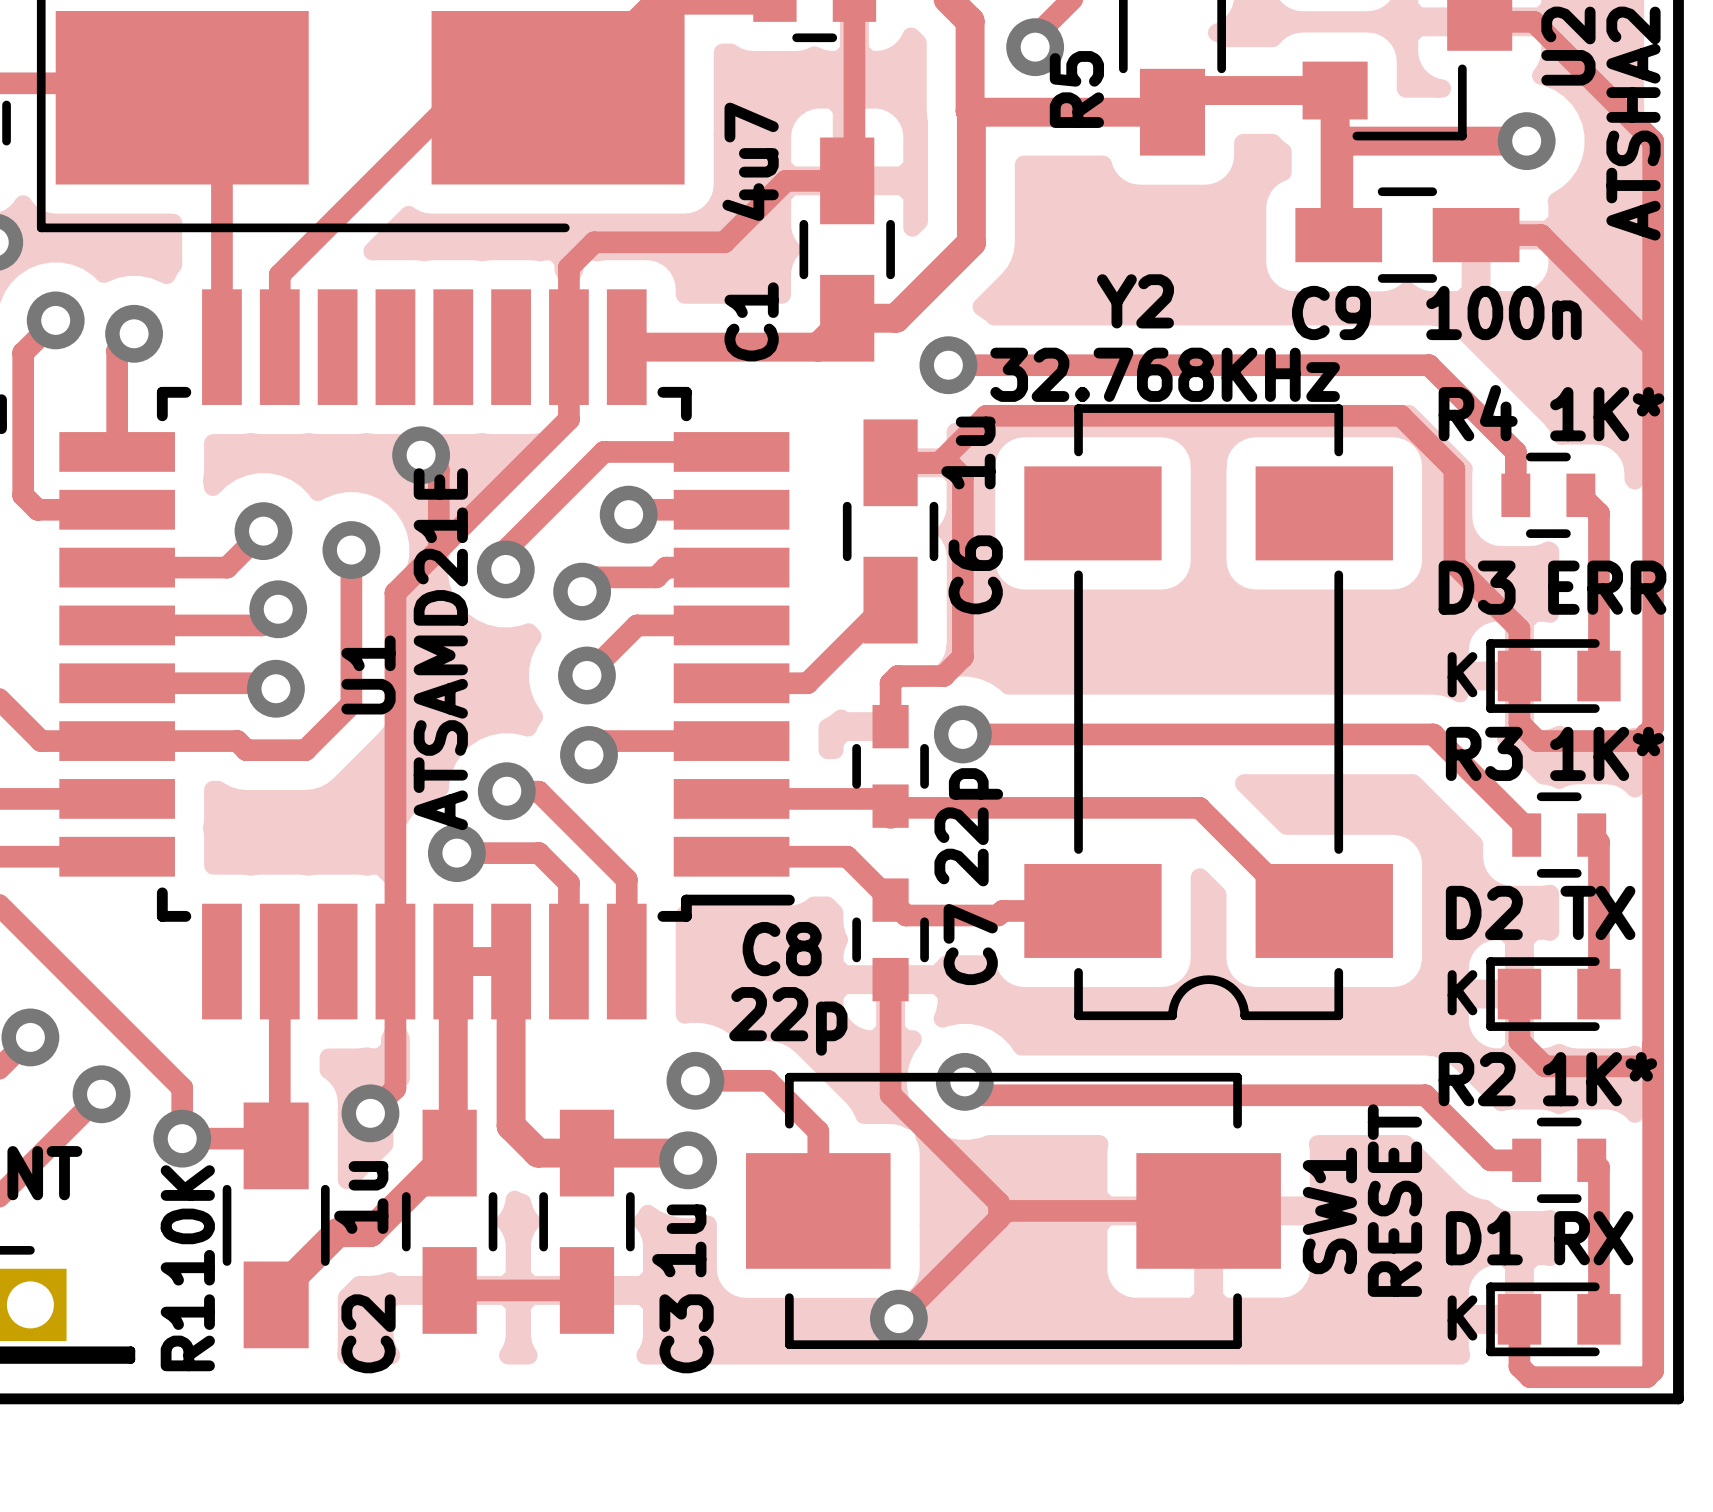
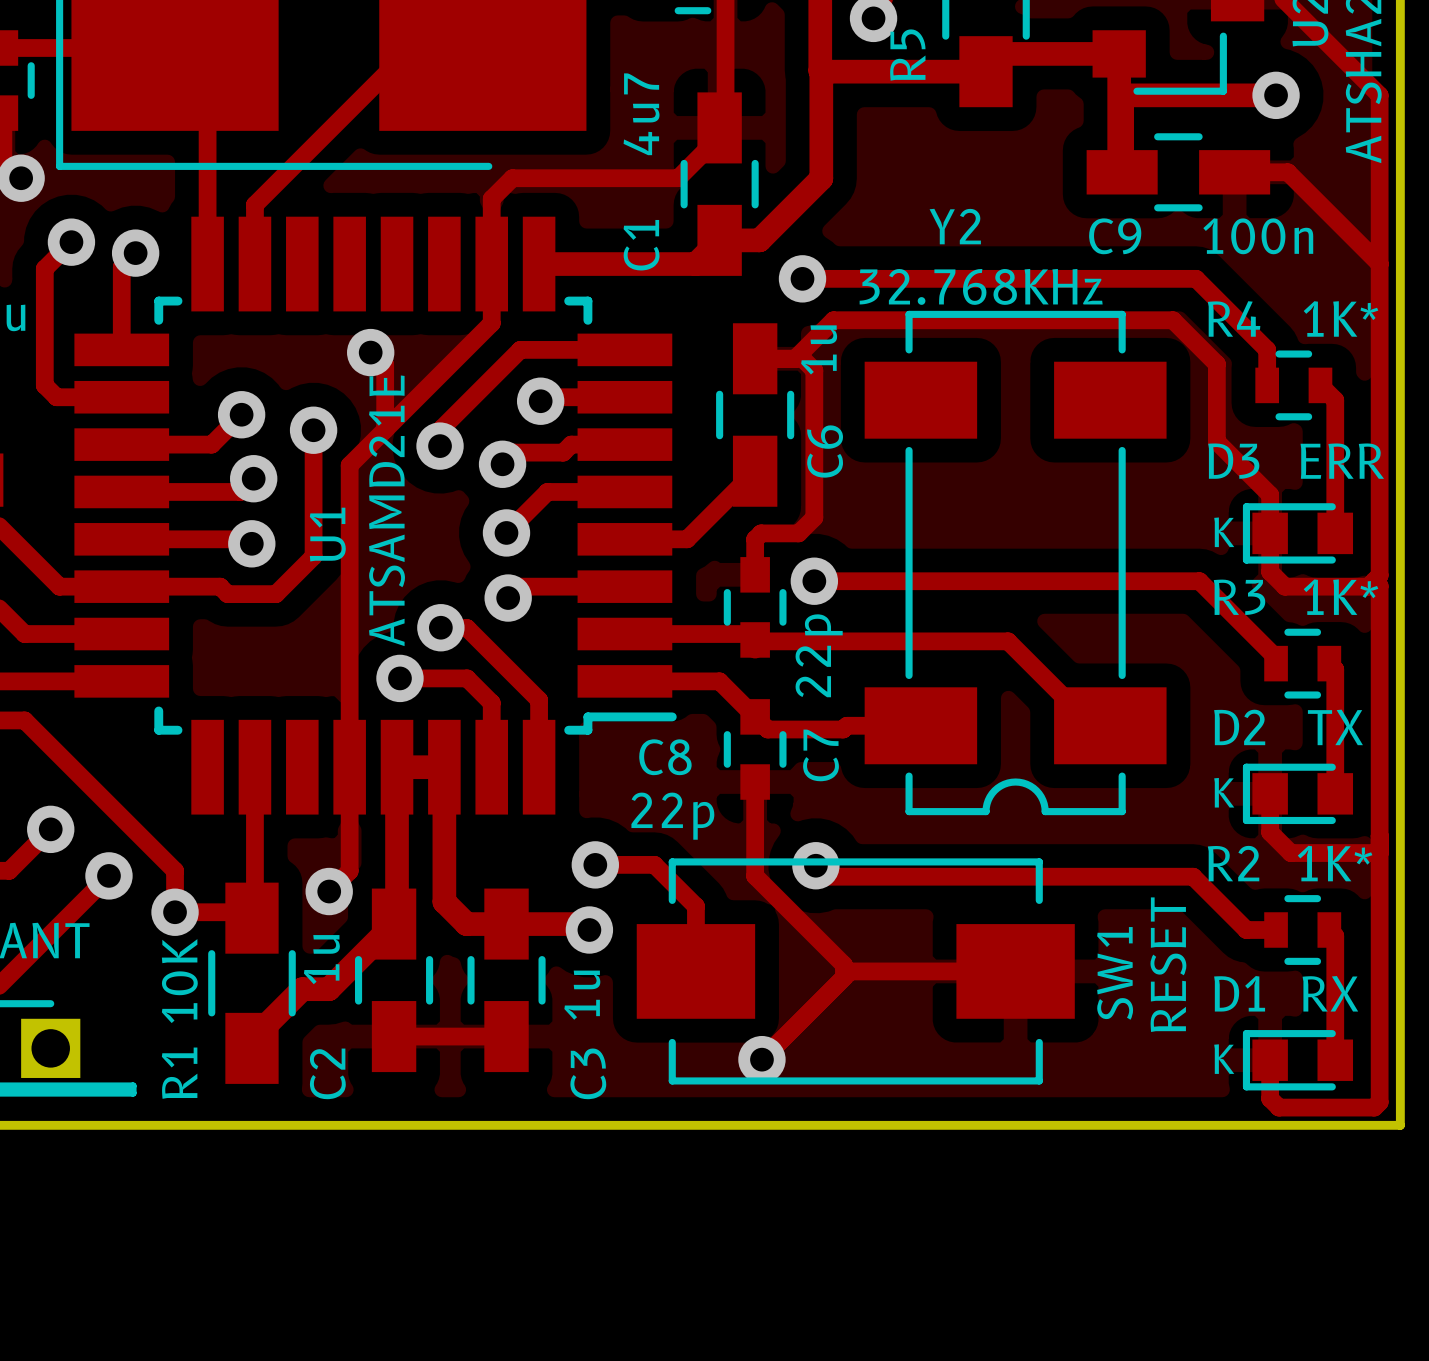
track: (847, 180) (785, 180) (724, 242) -> (719, 127) (719, 136) (678, 178) (619, 178)

